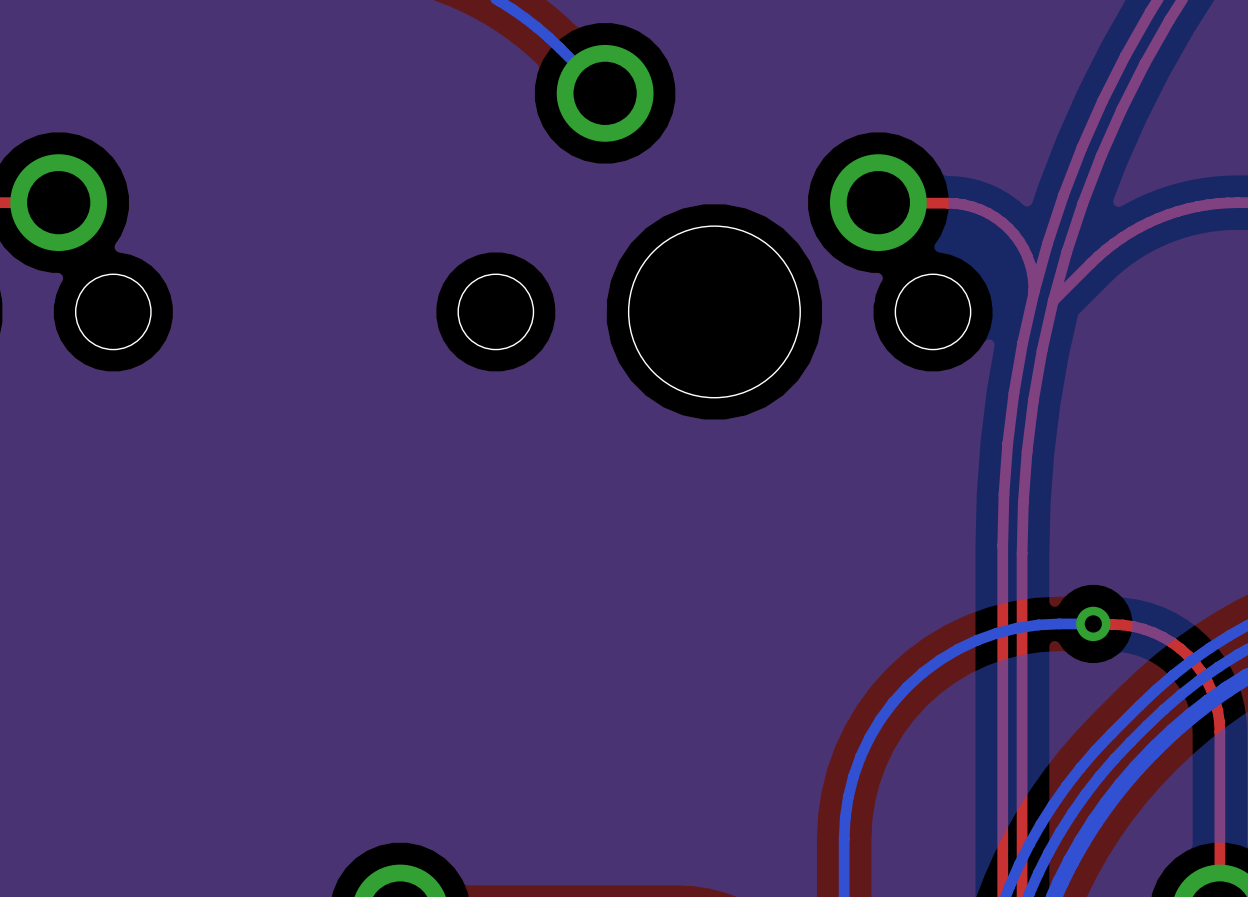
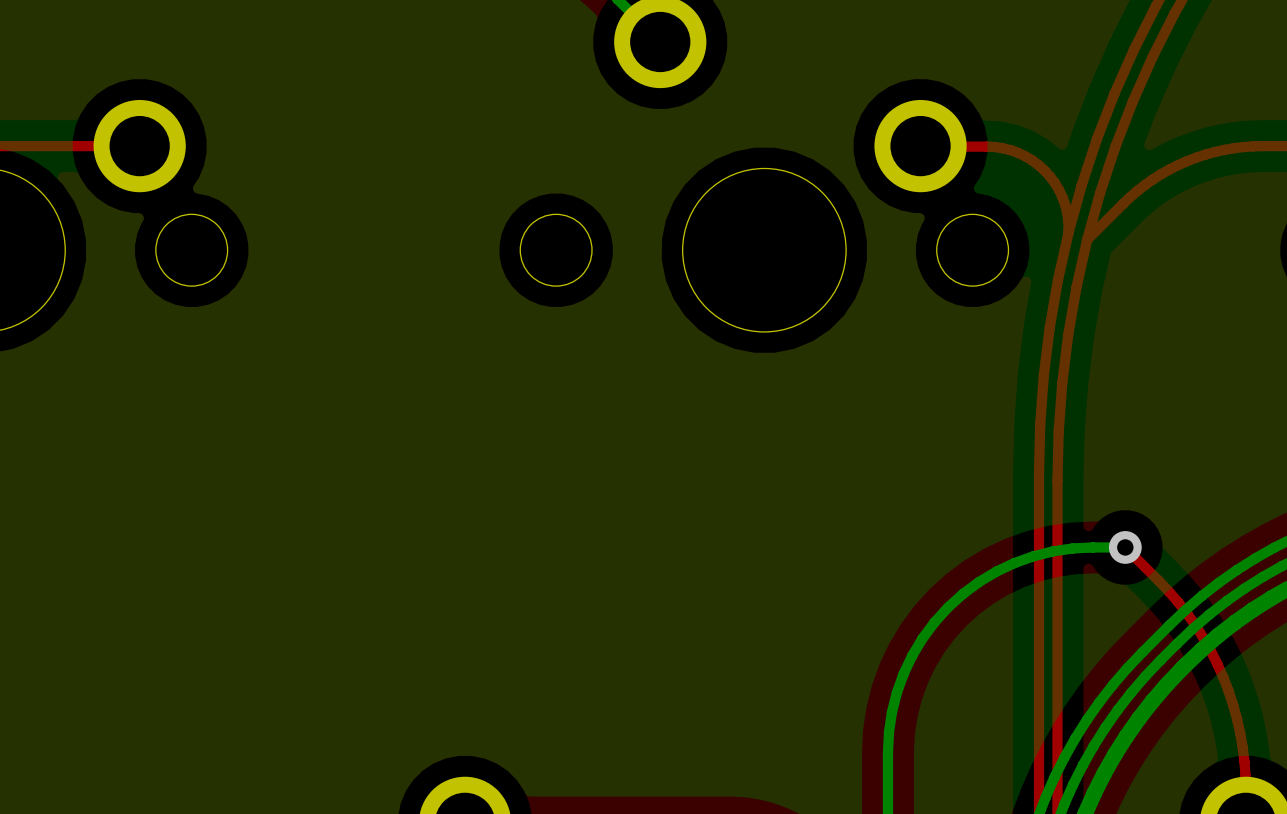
top track: (1093, 624) (1133, 626) (1163, 637) (1188, 655) (1207, 681) (1215, 700) (1219, 721) (1219, 879) -> (1125, 547) (1178, 602) (1195, 626) (1217, 664) (1228, 691) (1240, 733) (1245, 791)

